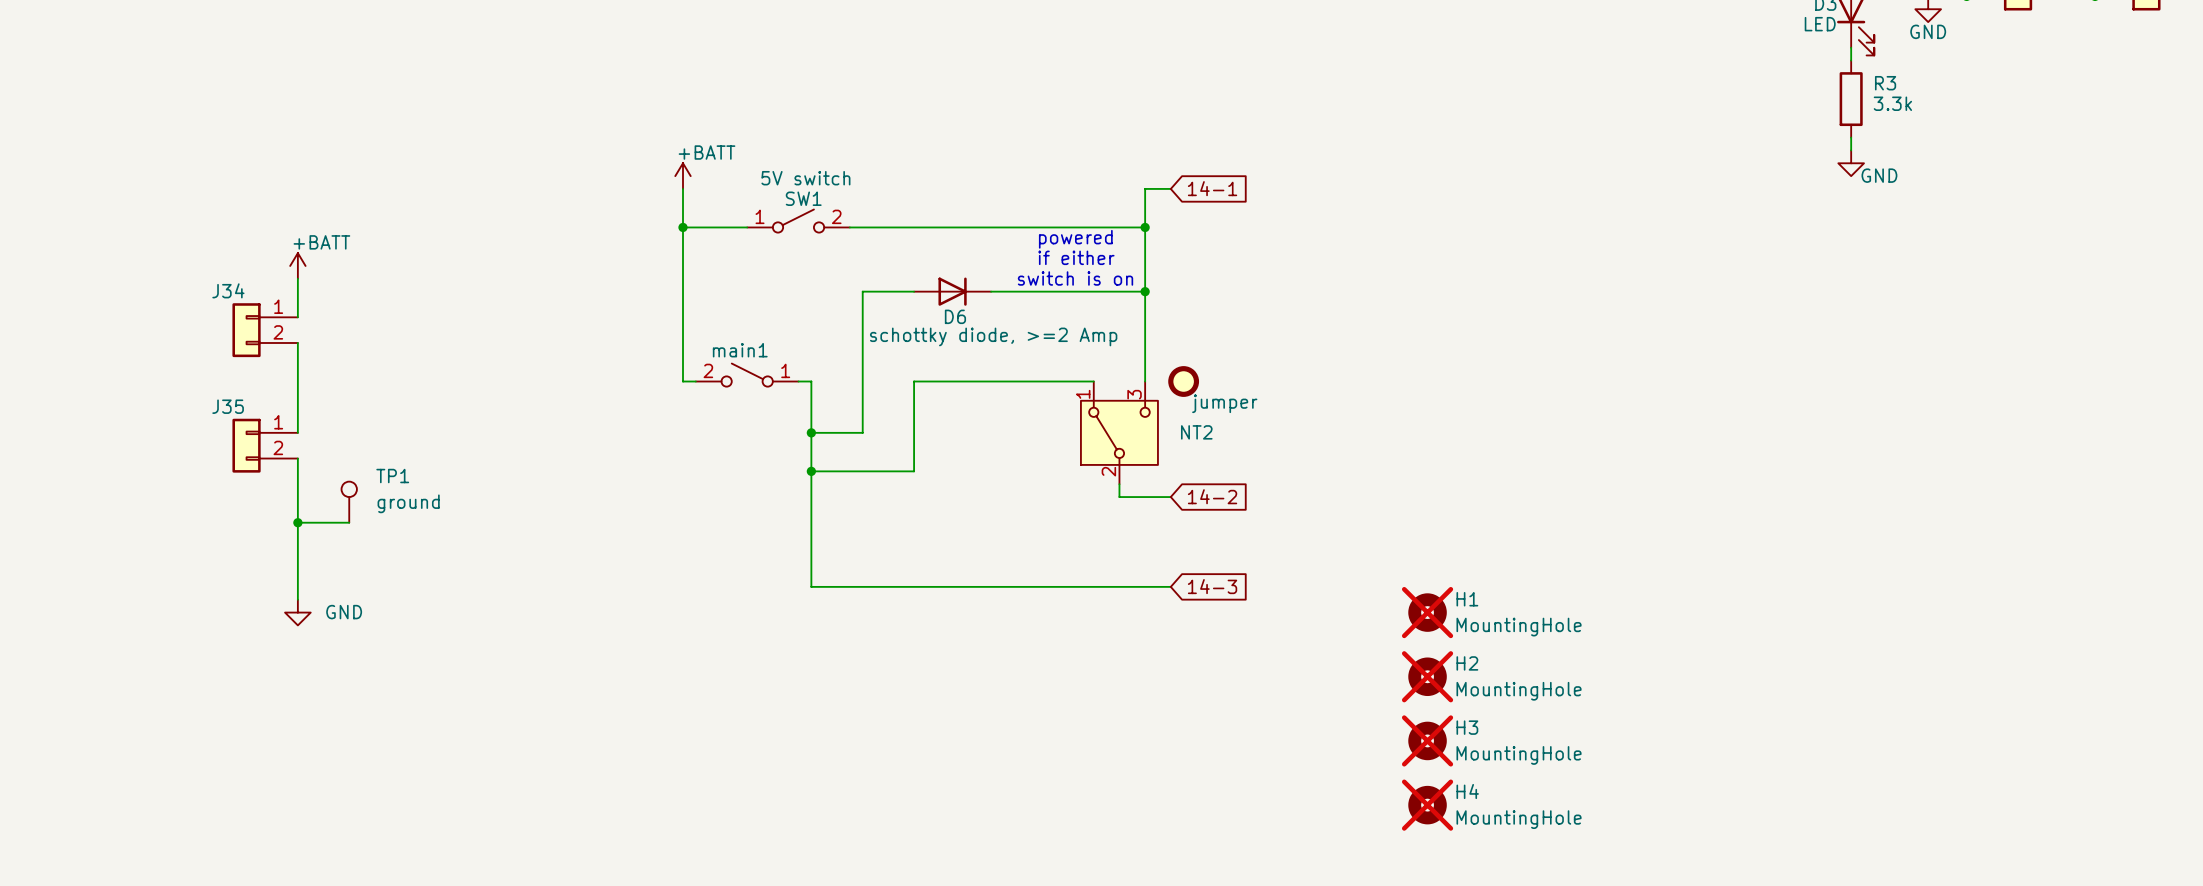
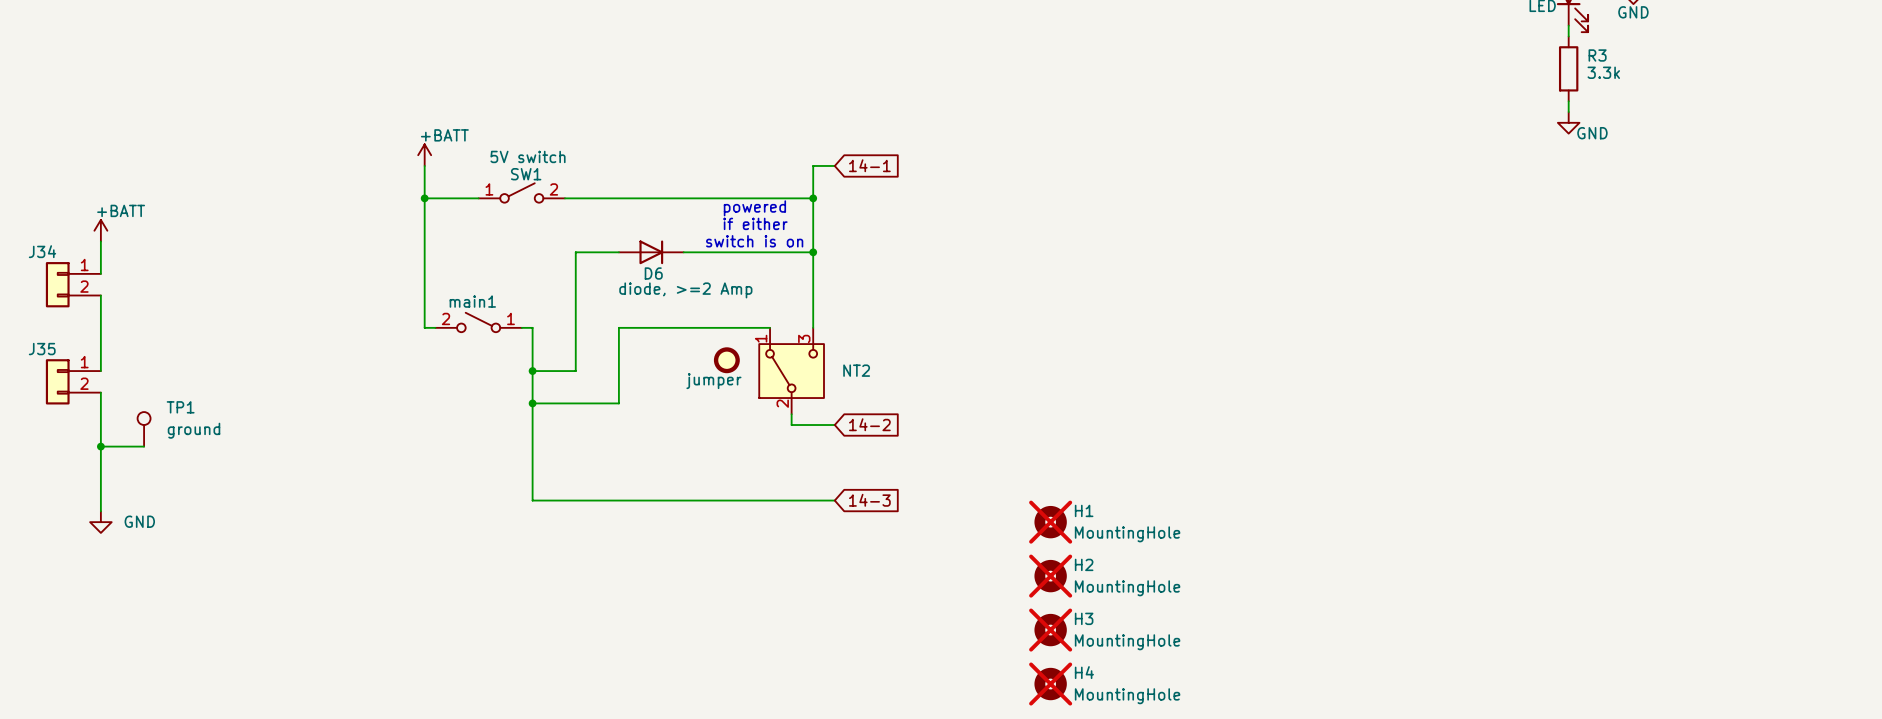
power symbol: +BATT (683, 176) -> none
wire: (683, 188) (683, 381) (695, 381) -> (424, 165) (424, 327) (435, 327)
wire: (1170, 188) (1145, 188) (1145, 381) -> (834, 165) (813, 165) (813, 327)
global label position: 14-1 (1212, 188) -> 14-1 (869, 165)
power symbol: none -> +BATT (424, 155)
SW1 position: (798, 221) -> (521, 192)
wire: (683, 227) (747, 227) -> (424, 198) (478, 198)
junction: (683, 227) -> none
wire: (849, 227) (1145, 227) -> (564, 198) (813, 198)
junction: (1145, 227) -> none
text position: powered (1075, 239) -> powered (754, 208)
junction: none -> (424, 198)
junction: none -> (813, 198)
text position: if either (1076, 257) -> if either (755, 223)
power symbol: +BATT (297, 265) -> none
wire: (297, 278) (297, 317) -> (100, 241) (100, 273)
text position: switch is on (1075, 278) -> switch is on (754, 241)
power symbol: none -> +BATT (100, 230)
wire: (914, 291) (862, 291) (862, 432) (811, 432) -> (618, 252) (575, 252) (575, 371) (532, 371)
D6 position: (952, 291) -> (651, 252)
wire: (991, 291) (1145, 291) -> (683, 252) (813, 252)
junction: (1145, 291) -> none
junction: none -> (813, 252)
J34 position: (265, 330) -> (73, 284)
D6 value: schottky diode, >=2 Amp (993, 336) -> diode, >=2 Amp (685, 290)
wire: (297, 342) (297, 432) -> (100, 295) (100, 371)
main1 position: (747, 375) -> (478, 322)
wire: (798, 381) (811, 381) (811, 586) (1170, 586) -> (521, 327) (532, 327) (532, 500) (834, 500)
wire: (1093, 381) (914, 381) (914, 471) (811, 471) -> (770, 327) (618, 327) (618, 403) (532, 403)
part: jumper (1183, 381) -> none
junction: (811, 432) -> none
NT2 position: (1119, 432) -> (791, 371)
J35 position: (265, 445) -> (73, 381)
part: none -> jumper (726, 360)
wire: (297, 458) (297, 599) -> (100, 392) (100, 511)
junction: none -> (532, 371)
junction: (811, 471) -> none
wire: (1119, 484) (1119, 497) (1170, 497) -> (791, 414) (791, 425) (834, 425)
global label position: 14-2 (1212, 496) -> 14-2 (869, 424)
junction: none -> (532, 403)
TP1 position: (349, 502) -> (144, 429)
wire: (297, 522) (349, 522) -> (100, 446) (144, 446)
junction: (297, 522) -> none
junction: none -> (100, 446)
global label position: 14-3 (1212, 586) -> 14-3 (869, 500)
power symbol position: GND (297, 612) -> GND (100, 522)
H1 position: (1427, 612) -> (1050, 522)
H2 position: (1427, 676) -> (1050, 576)
H3 position: (1427, 740) -> (1050, 630)
H4 position: (1427, 805) -> (1050, 684)

